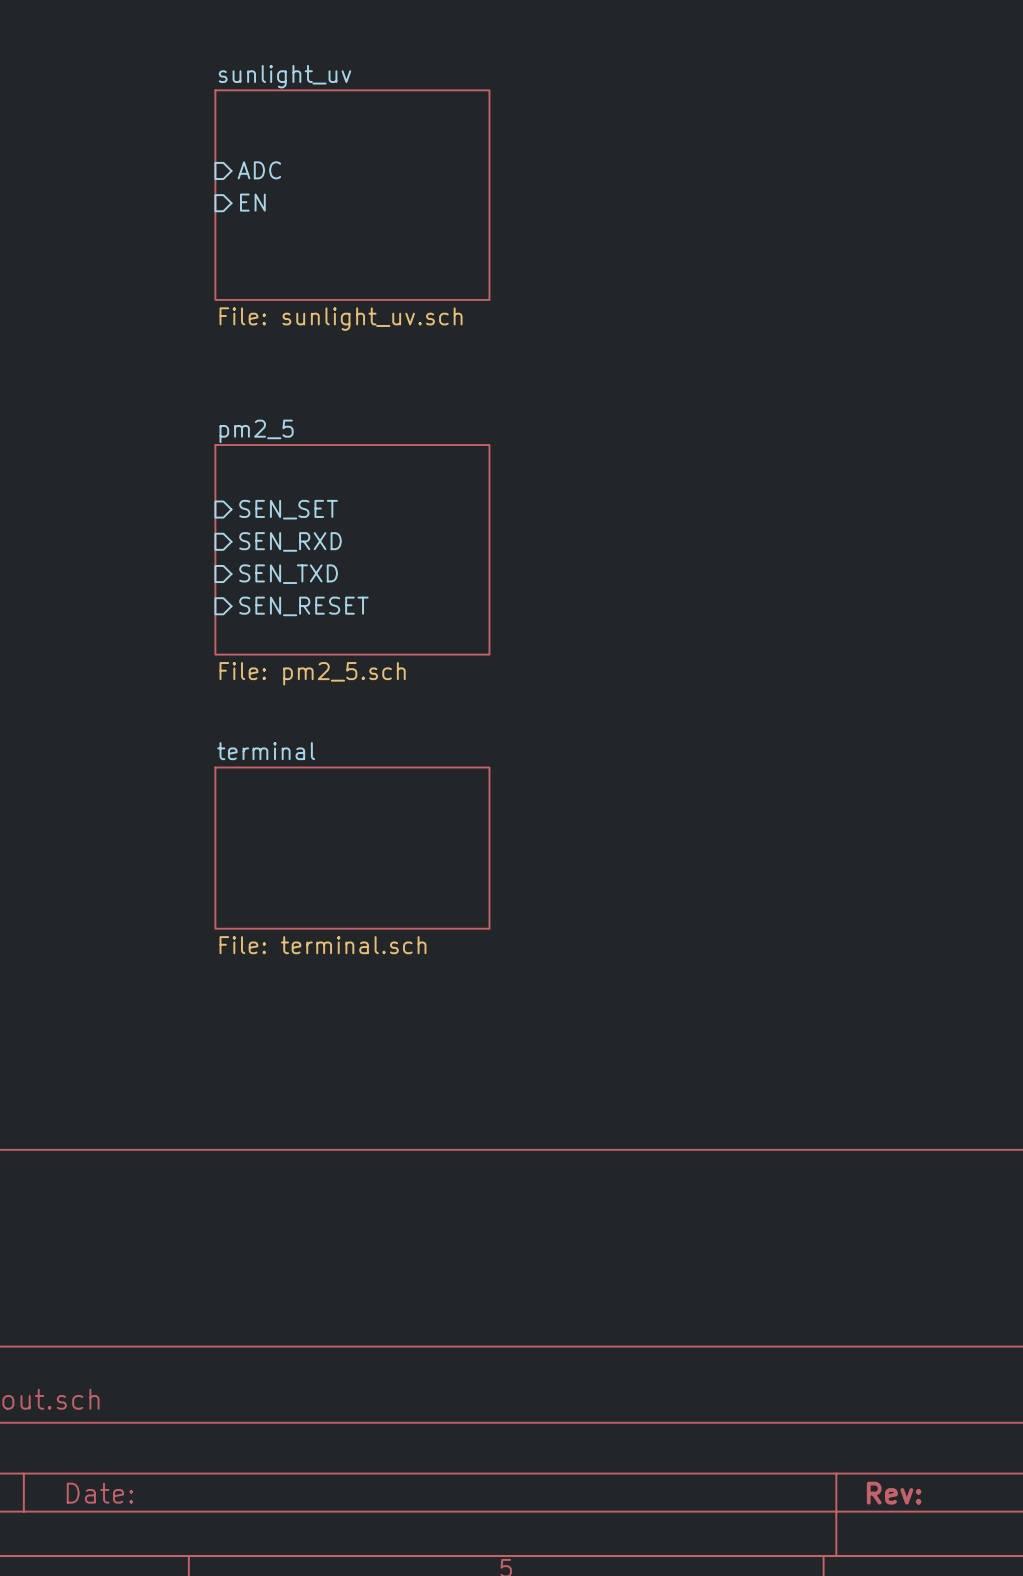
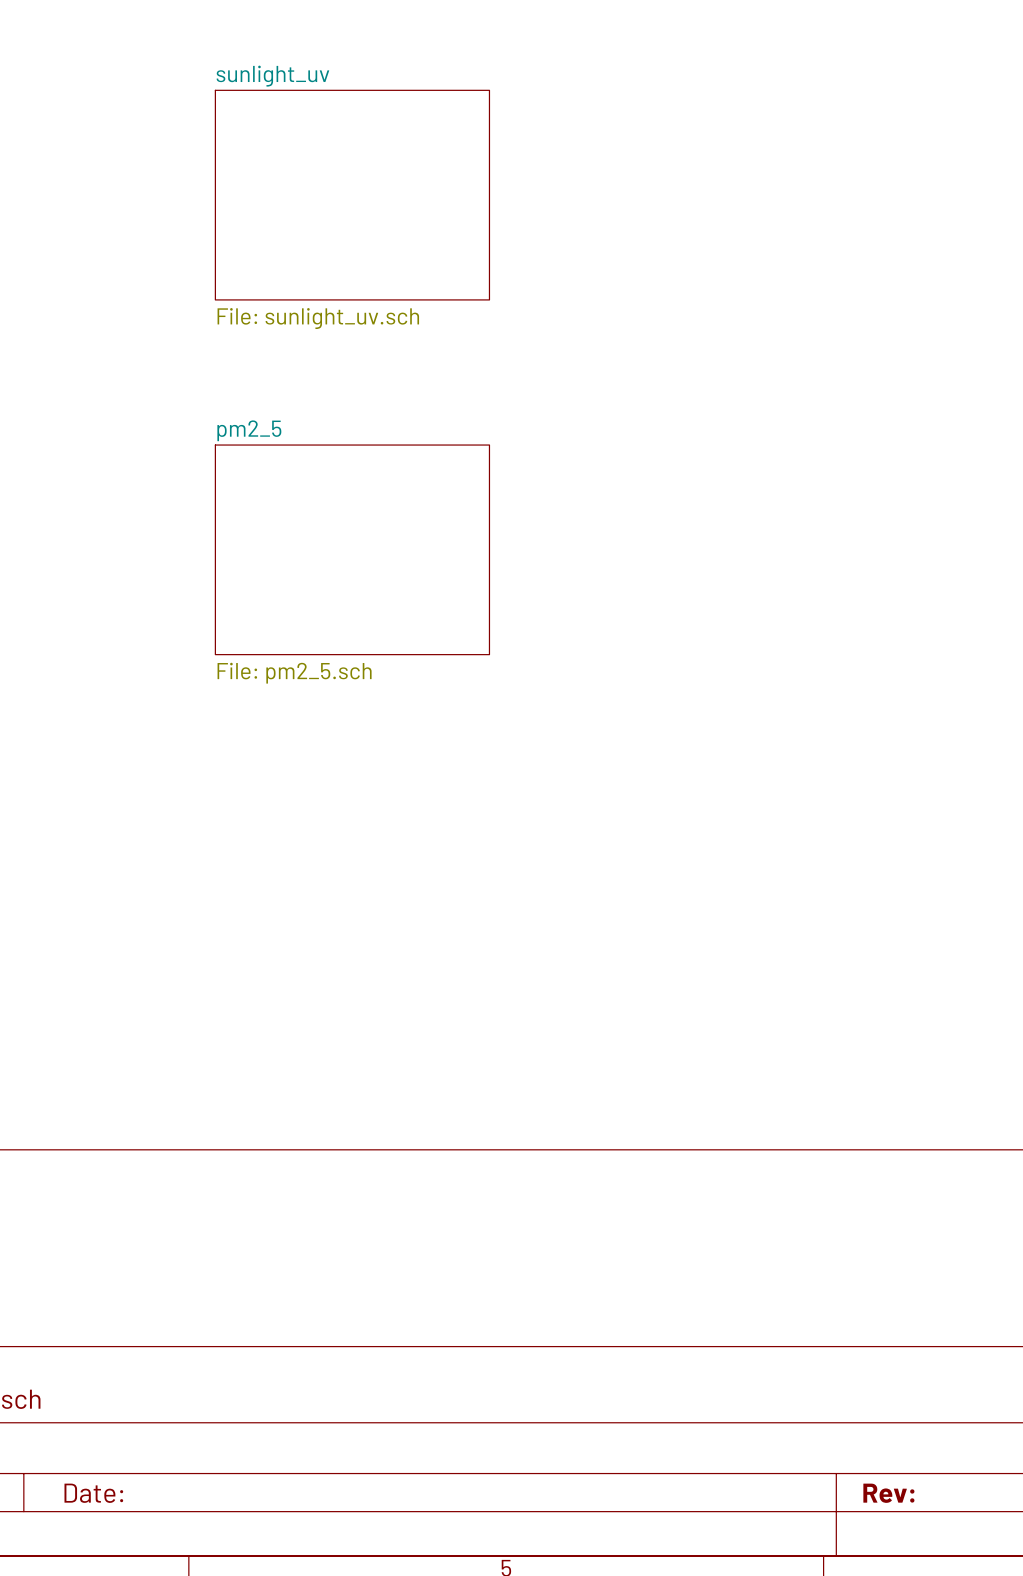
sheet pin: ADC (259, 170) -> none
sheet pin: EN (252, 202) -> none
sheet pin: SEN_SET (288, 509) -> none
sheet pin: SEN_RXD (290, 541) -> none
sheet pin: SEN_TXD (288, 574) -> none
sheet pin: SEN_RESET (303, 606) -> none
sheet terminal: File: terminal.sch (352, 848) -> none

